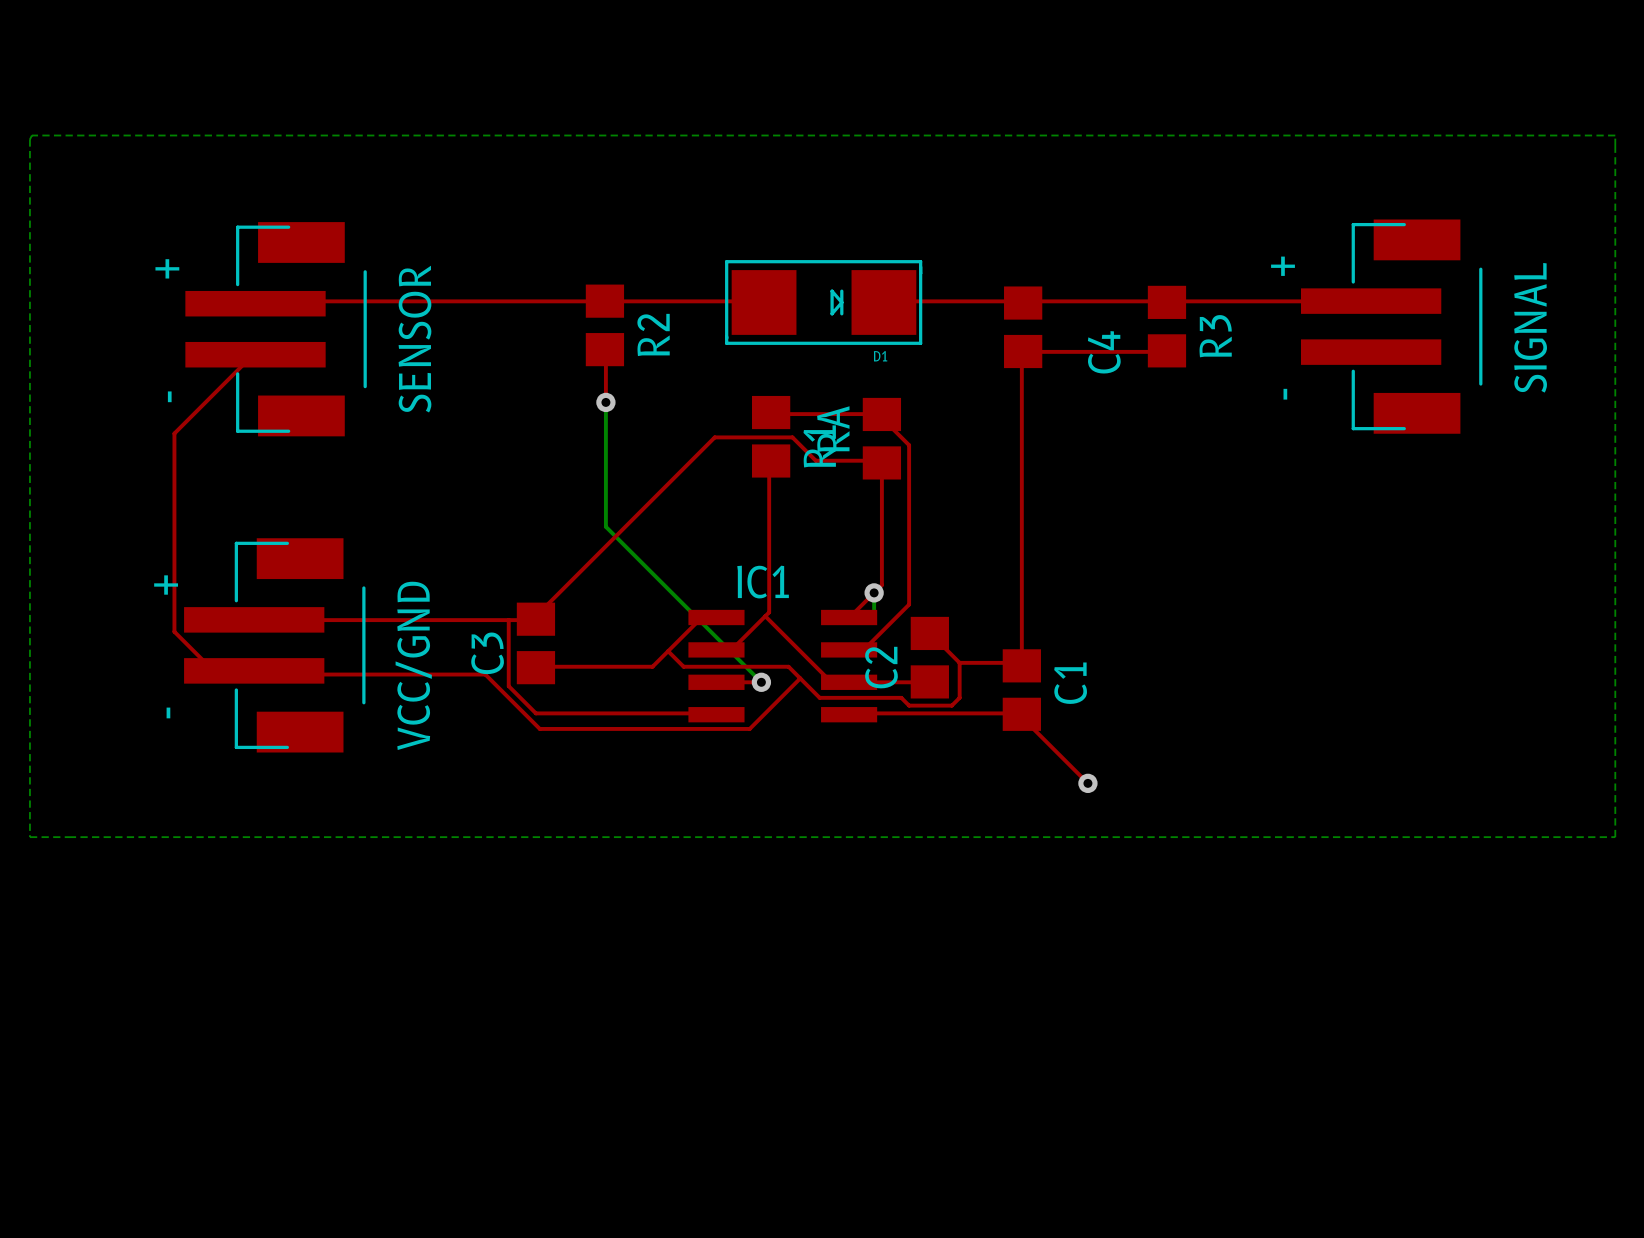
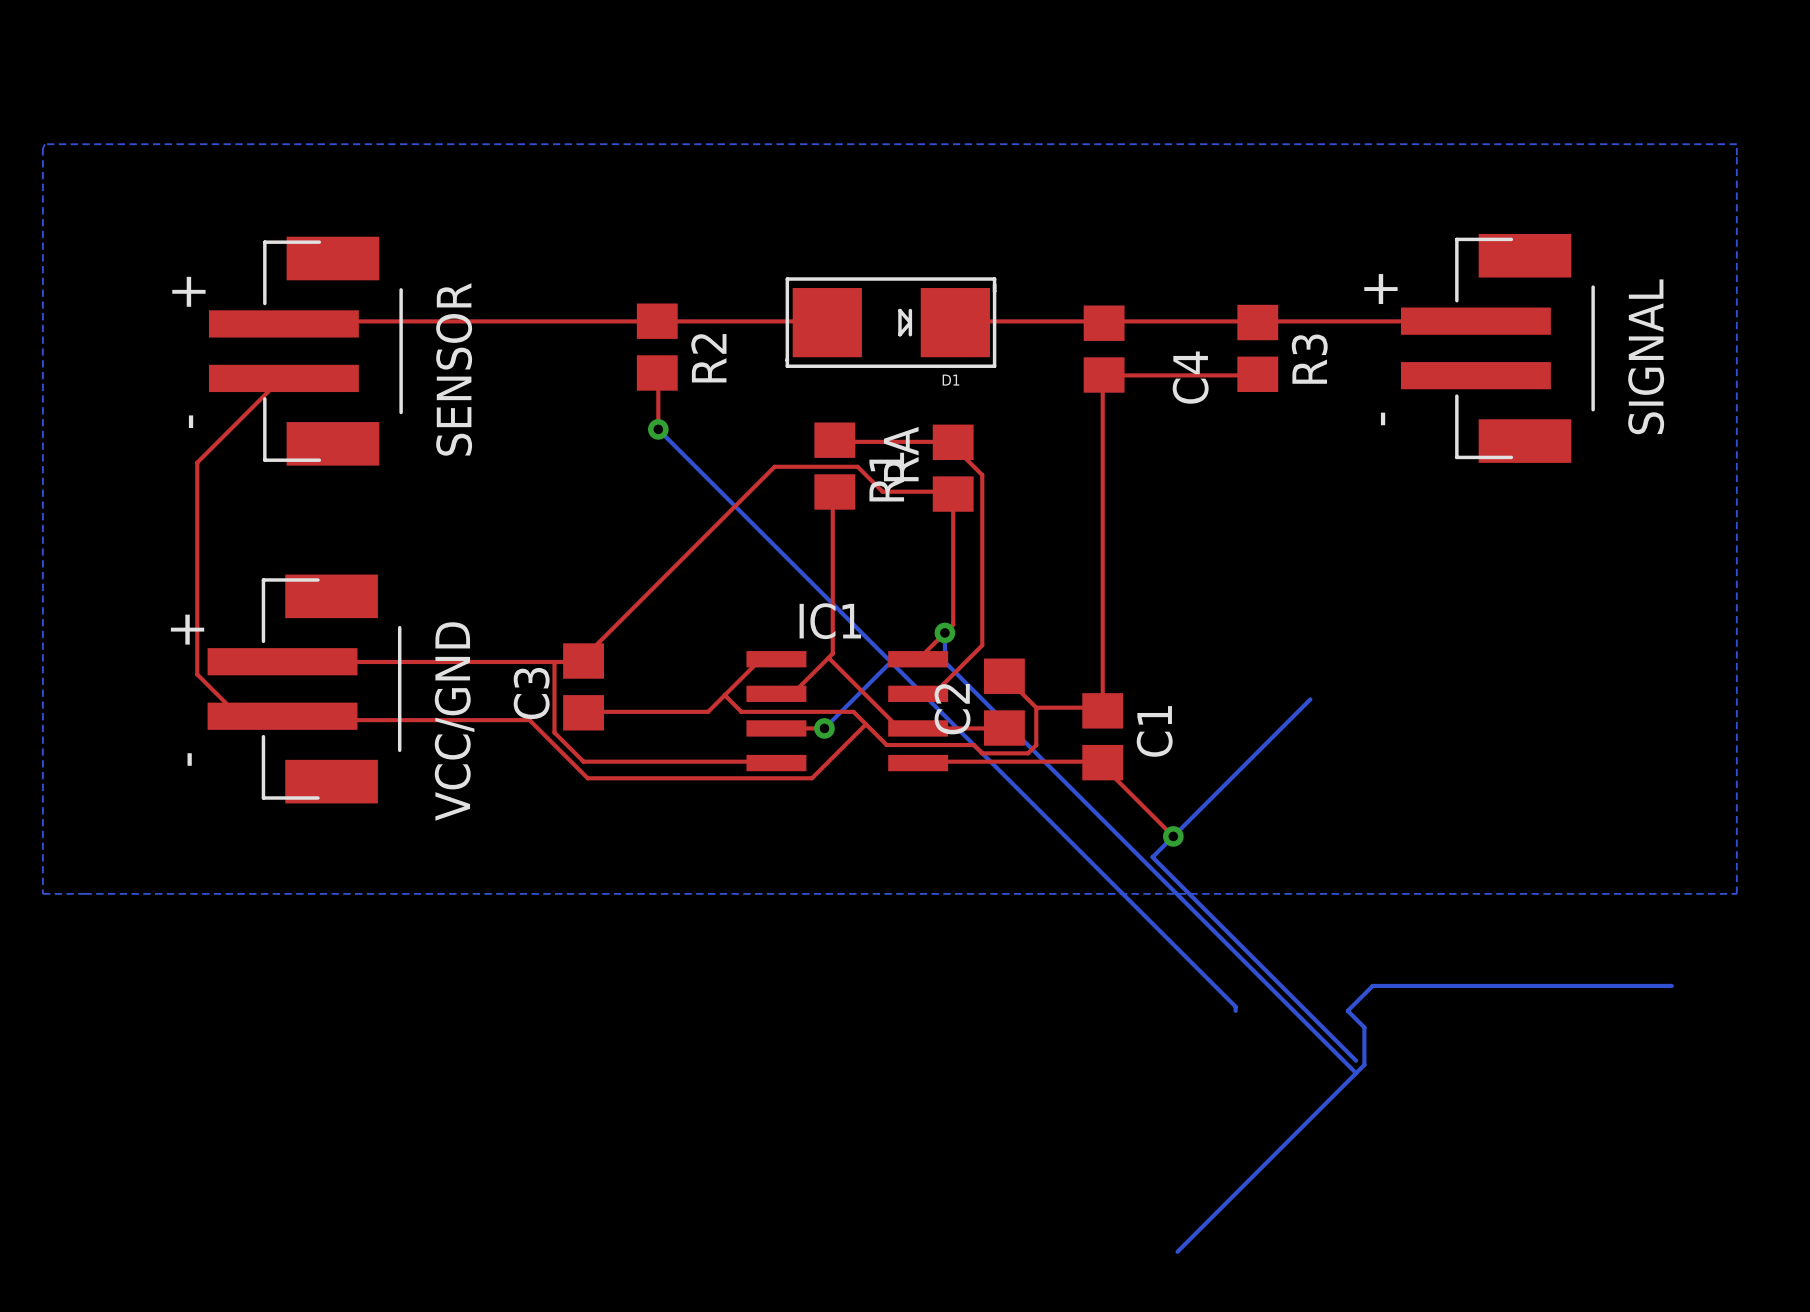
bottom track: (605, 402) (605, 526) (761, 682) -> (890, 661) (824, 728)
bottom track: none -> (658, 429) (1235, 1006) (1235, 1010)
bottom track: none -> (944, 661) (1356, 1073)
bottom track: none -> (1310, 699) (1152, 857) (1356, 1060)
bottom track: none -> (1671, 985) (1372, 985) (1347, 1010) (1364, 1027) (1364, 1064) (1177, 1251)

